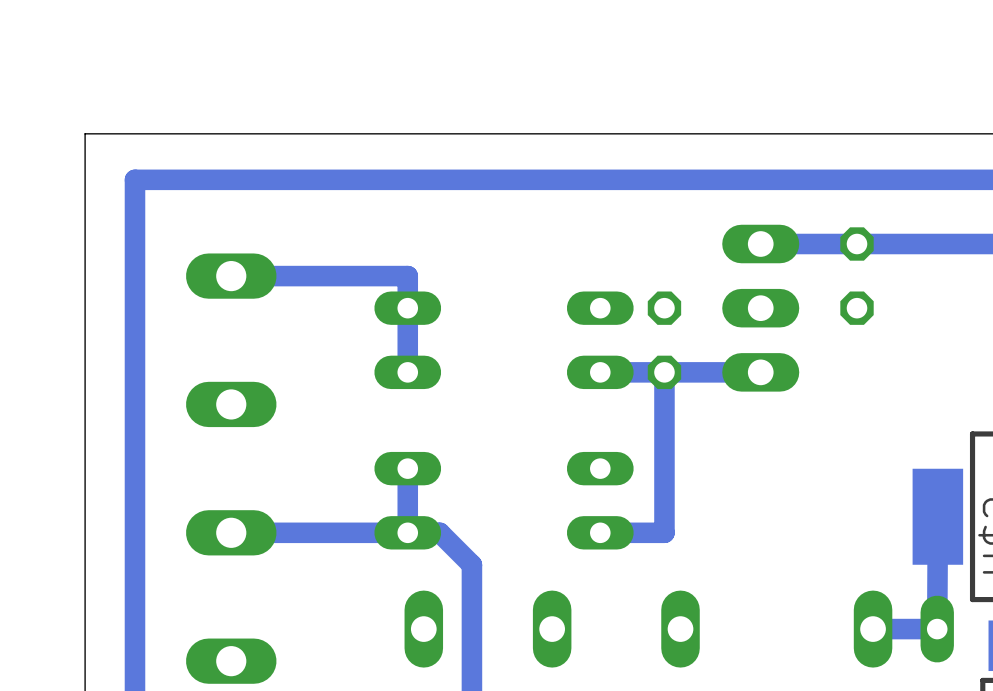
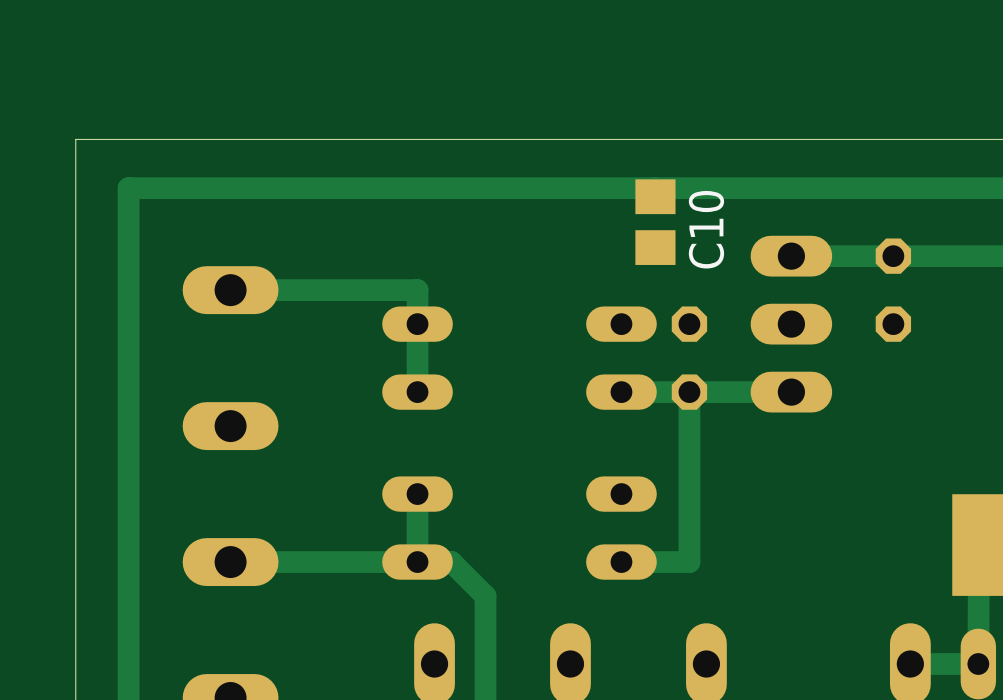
C10: none -> (655, 222)

